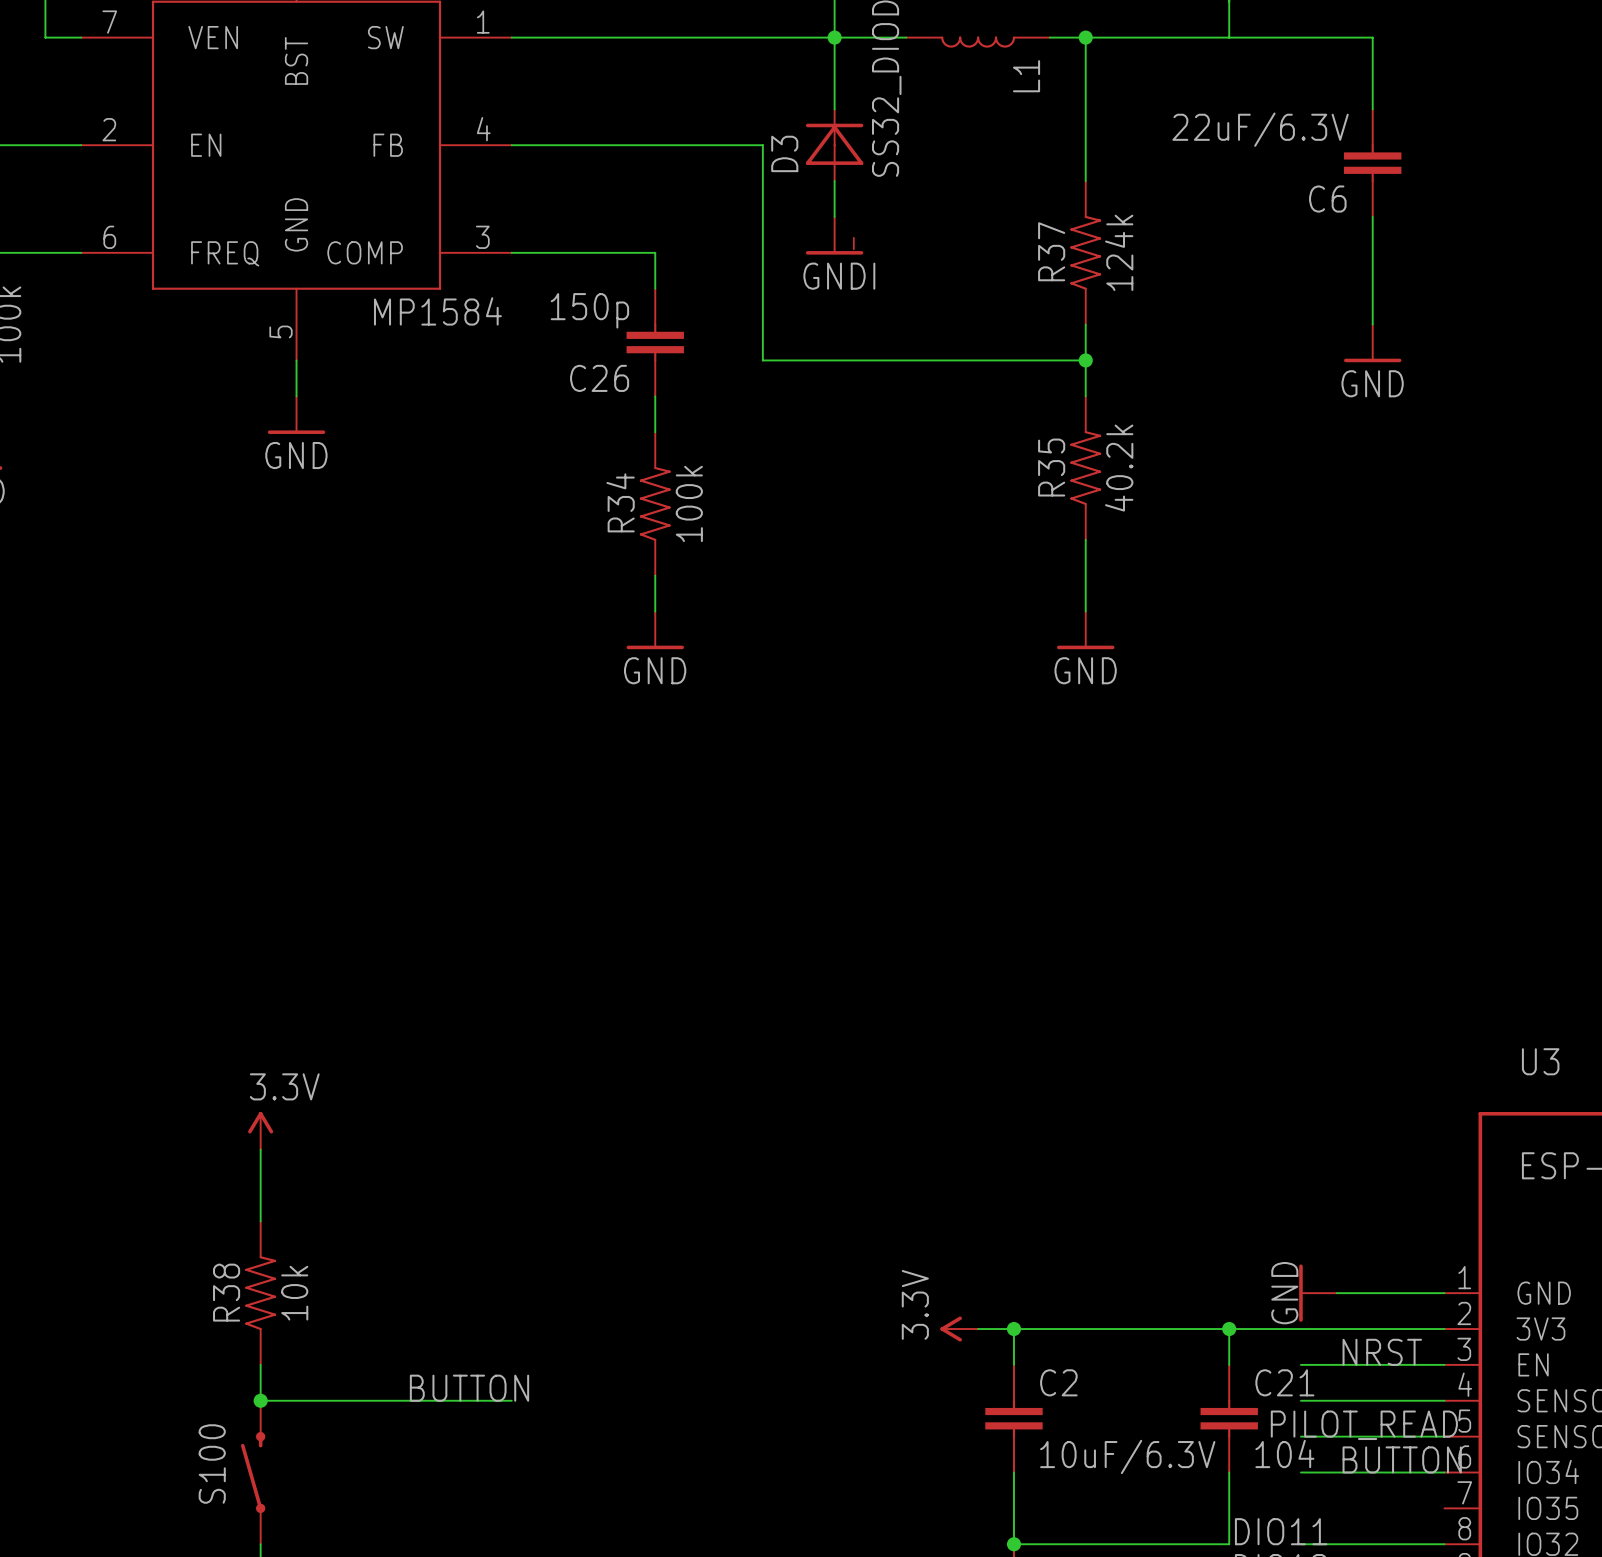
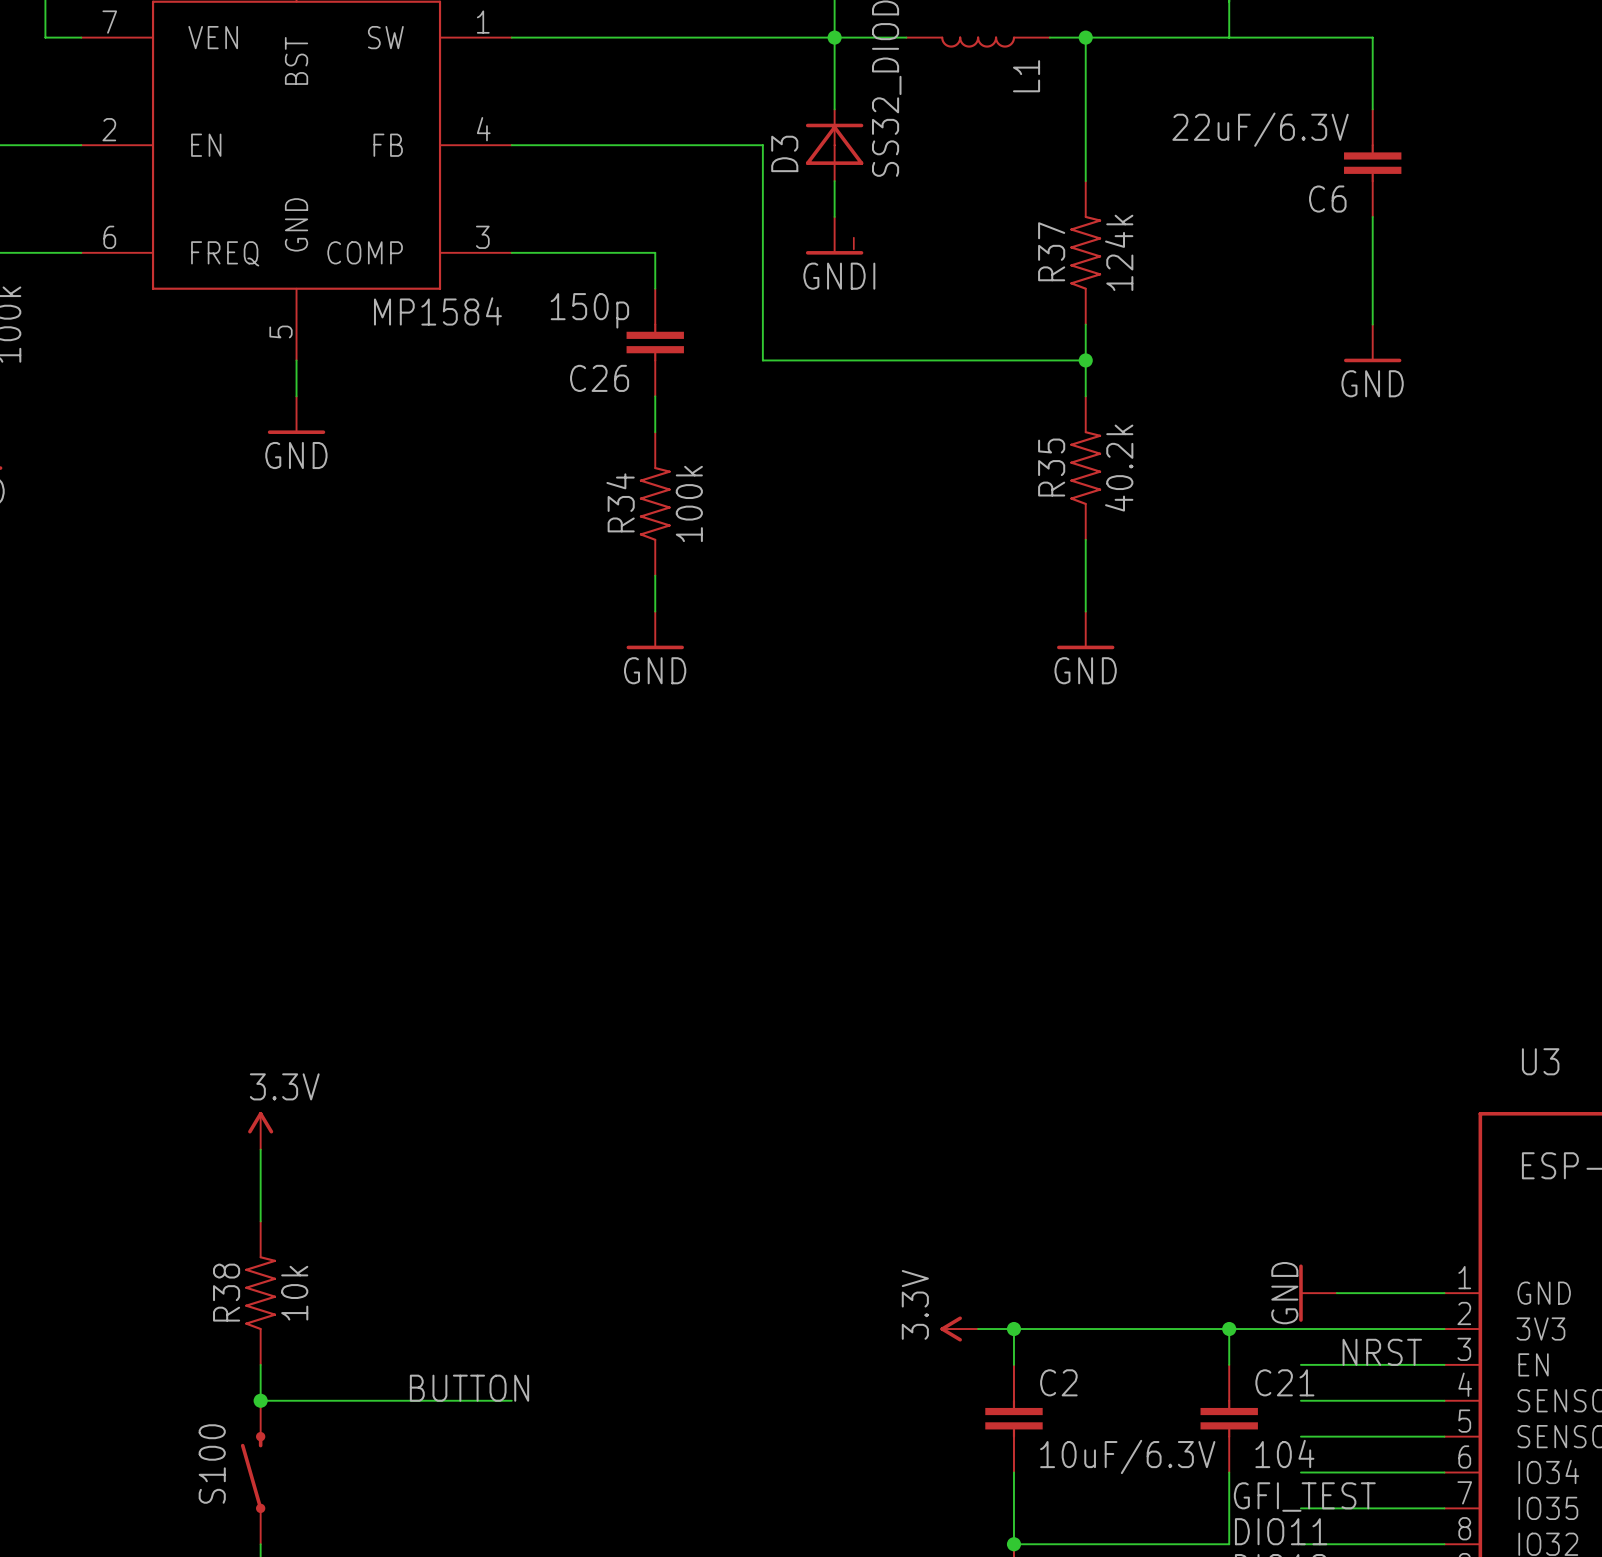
label: PILOT_READ (1364, 1425) -> none
label: BUTTON (1402, 1459) -> none
label: none -> GFI_TEST (1304, 1497)
wire: none -> (1300, 1508) (1444, 1508)

